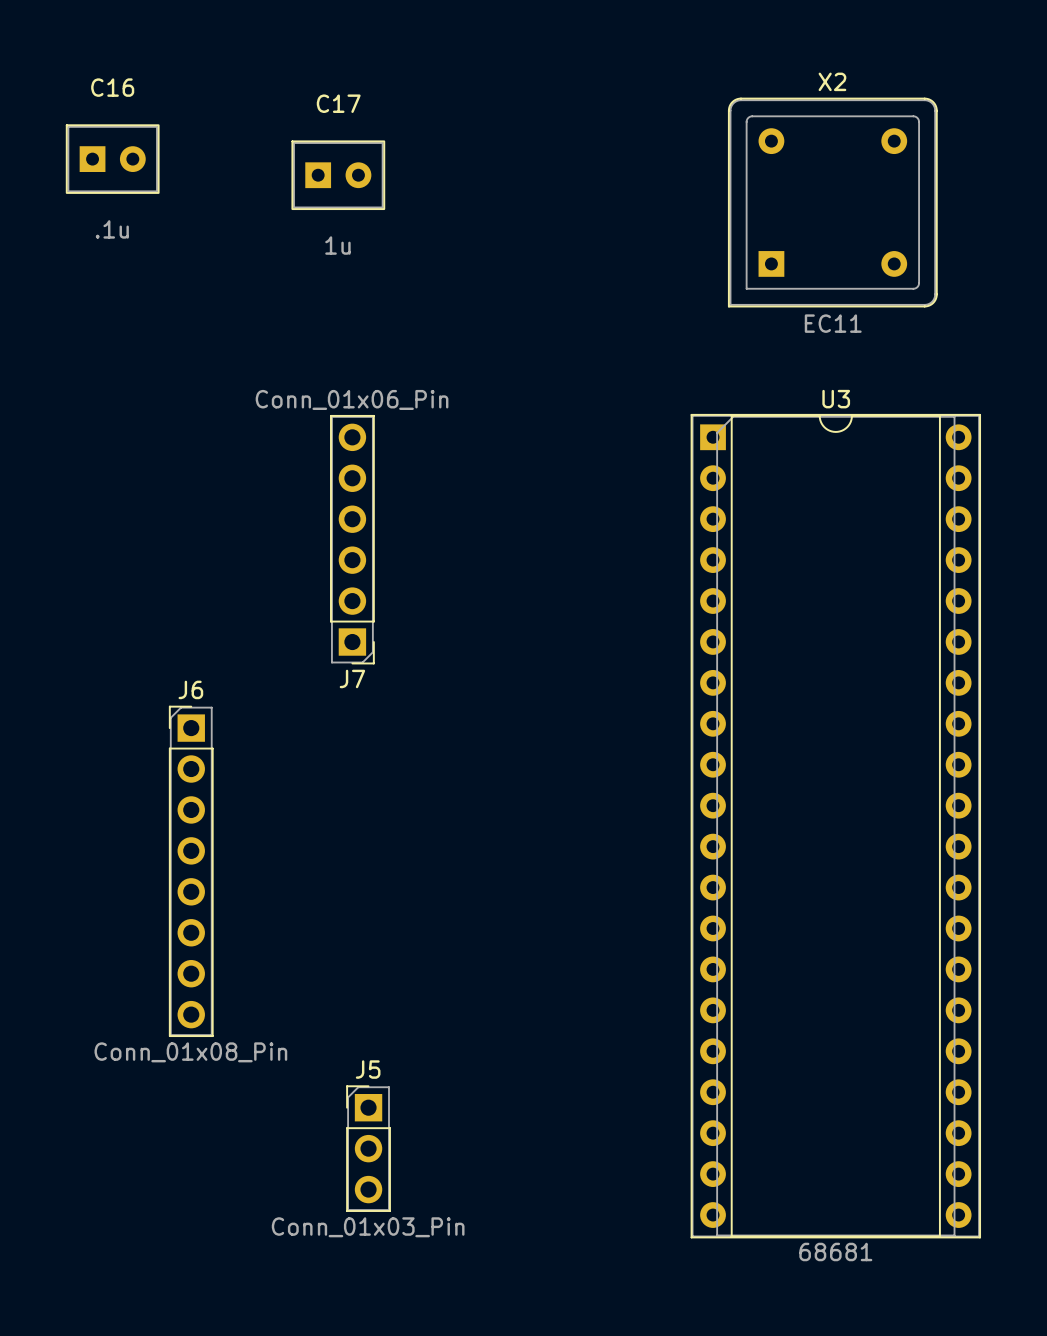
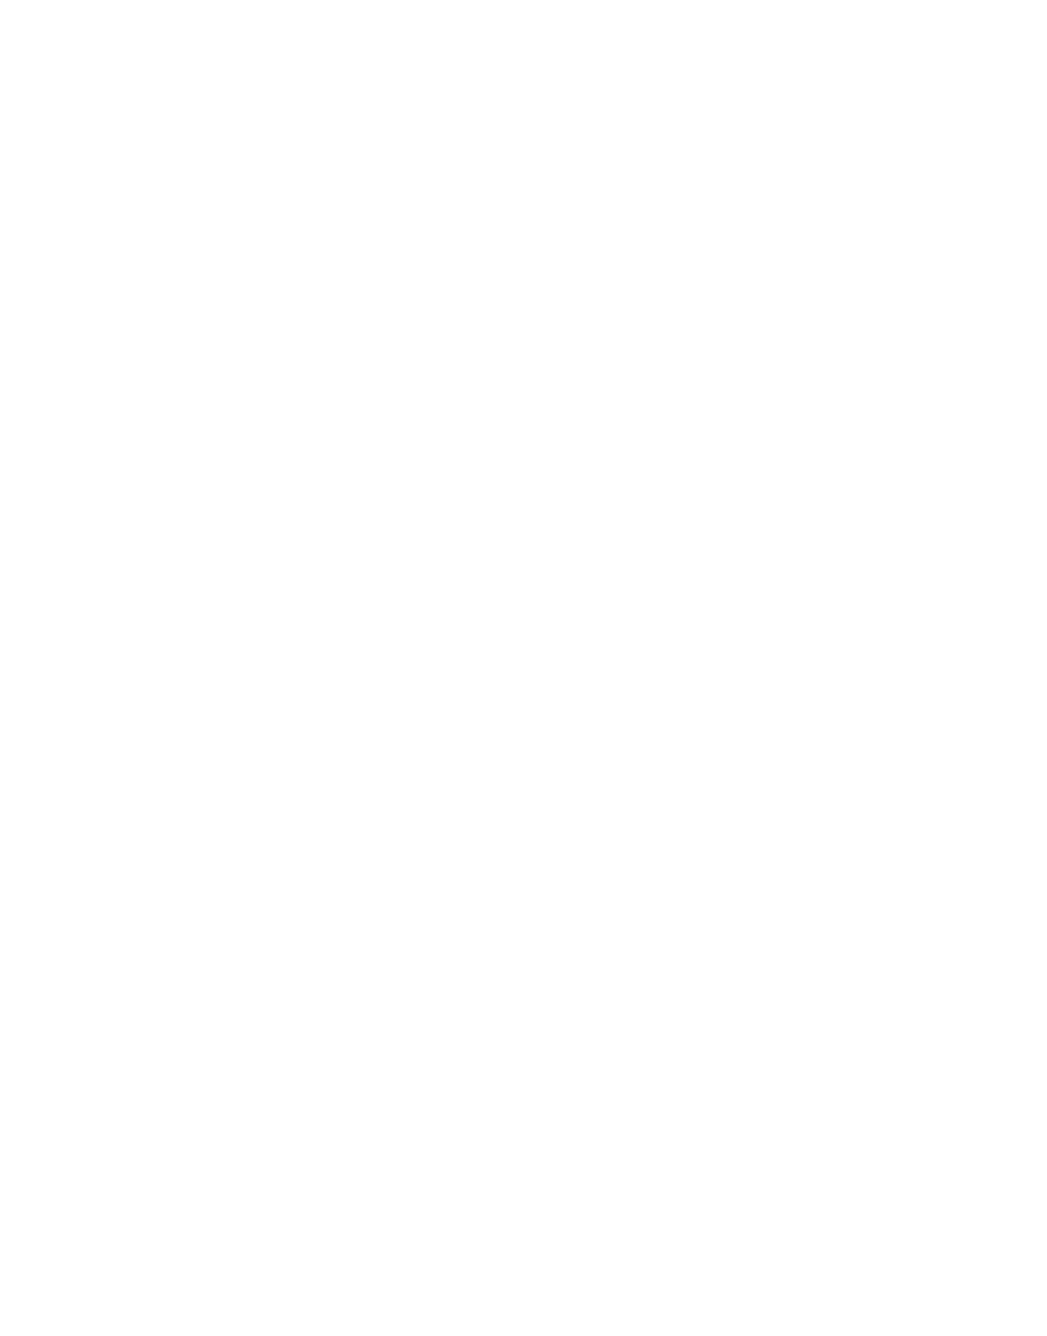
C16: .1u (112, 159) -> none
C17: 1u (338, 175) -> none
X2: EC11 (832, 202) -> none
J7: Conn_01x06_Pin (352, 539) -> none
U3: 68681 (835, 826) -> none
J6: Conn_01x08_Pin (191, 871) -> none
J5: Conn_01x03_Pin (368, 1148) -> none

